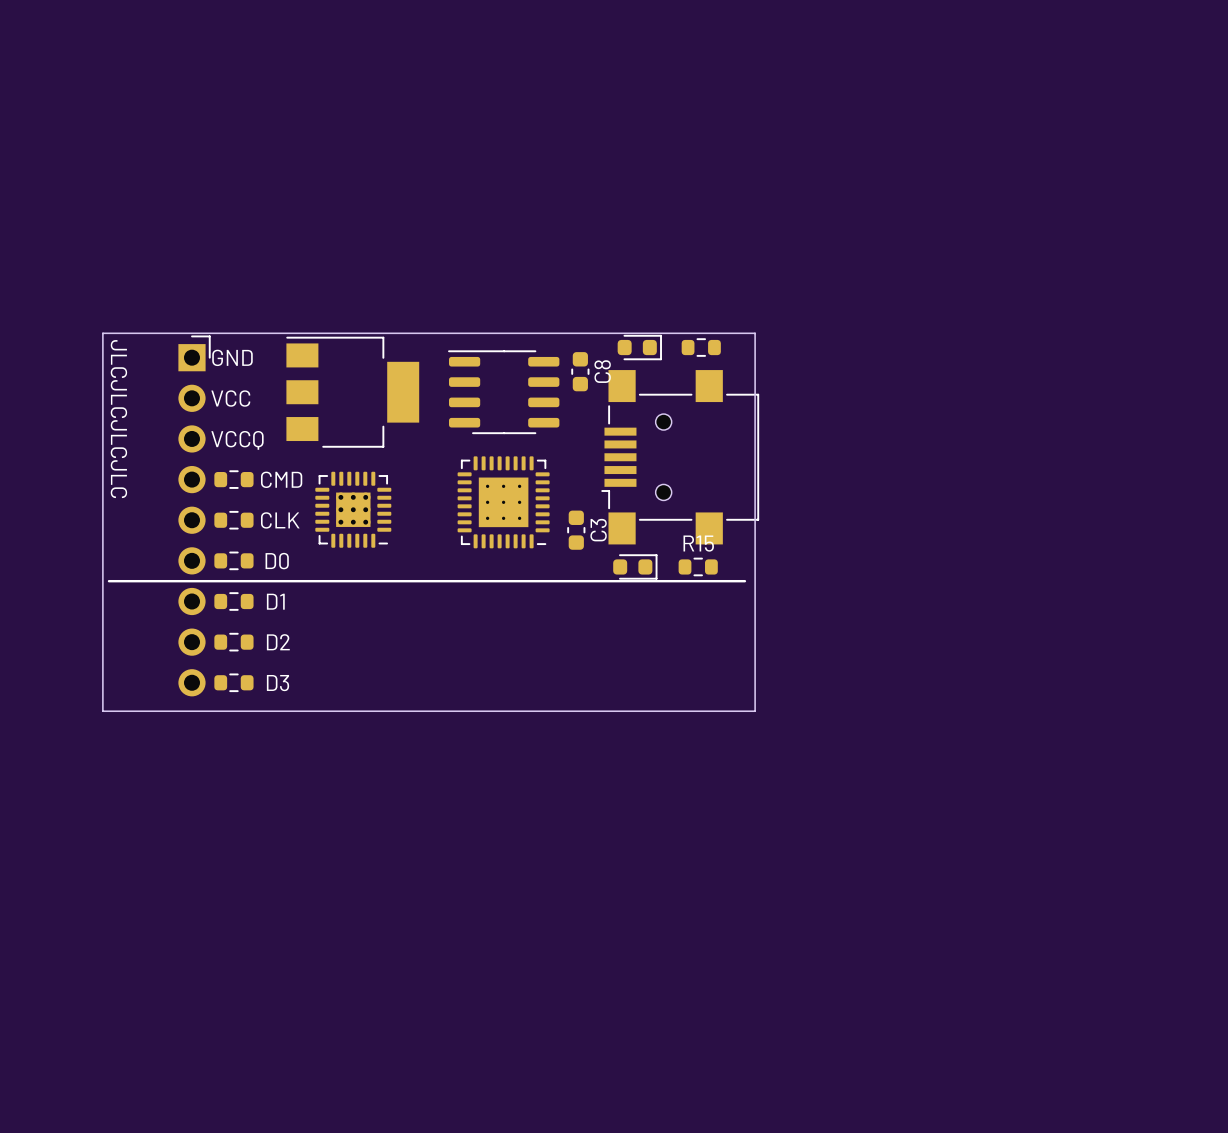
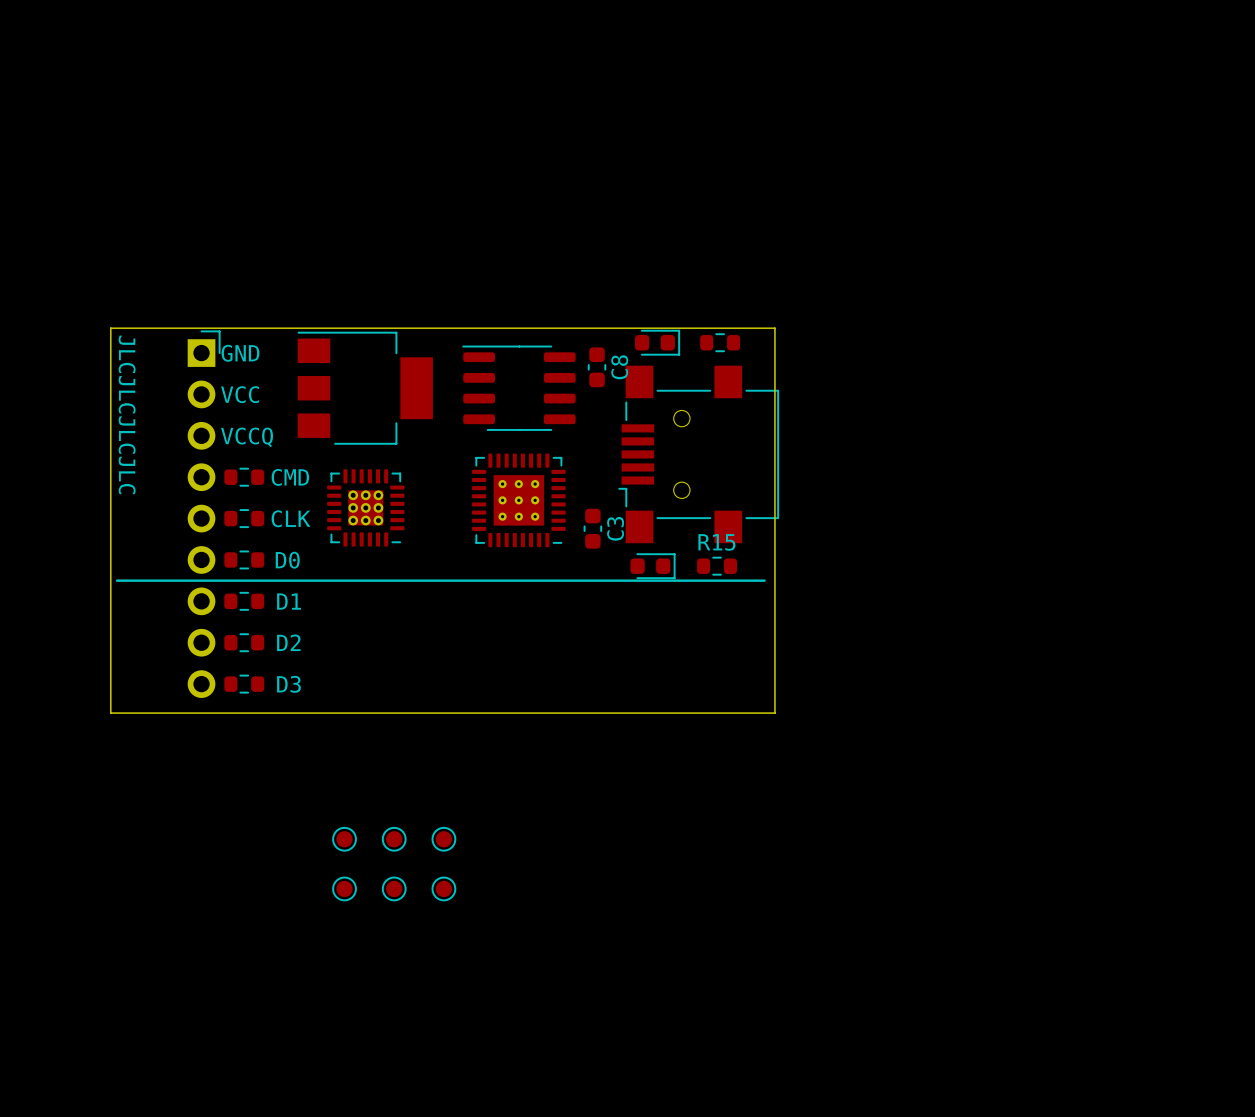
part: none -> (344, 839)
part: none -> (394, 839)
part: none -> (443, 839)
part: none -> (344, 888)
part: none -> (394, 888)
part: none -> (443, 888)

